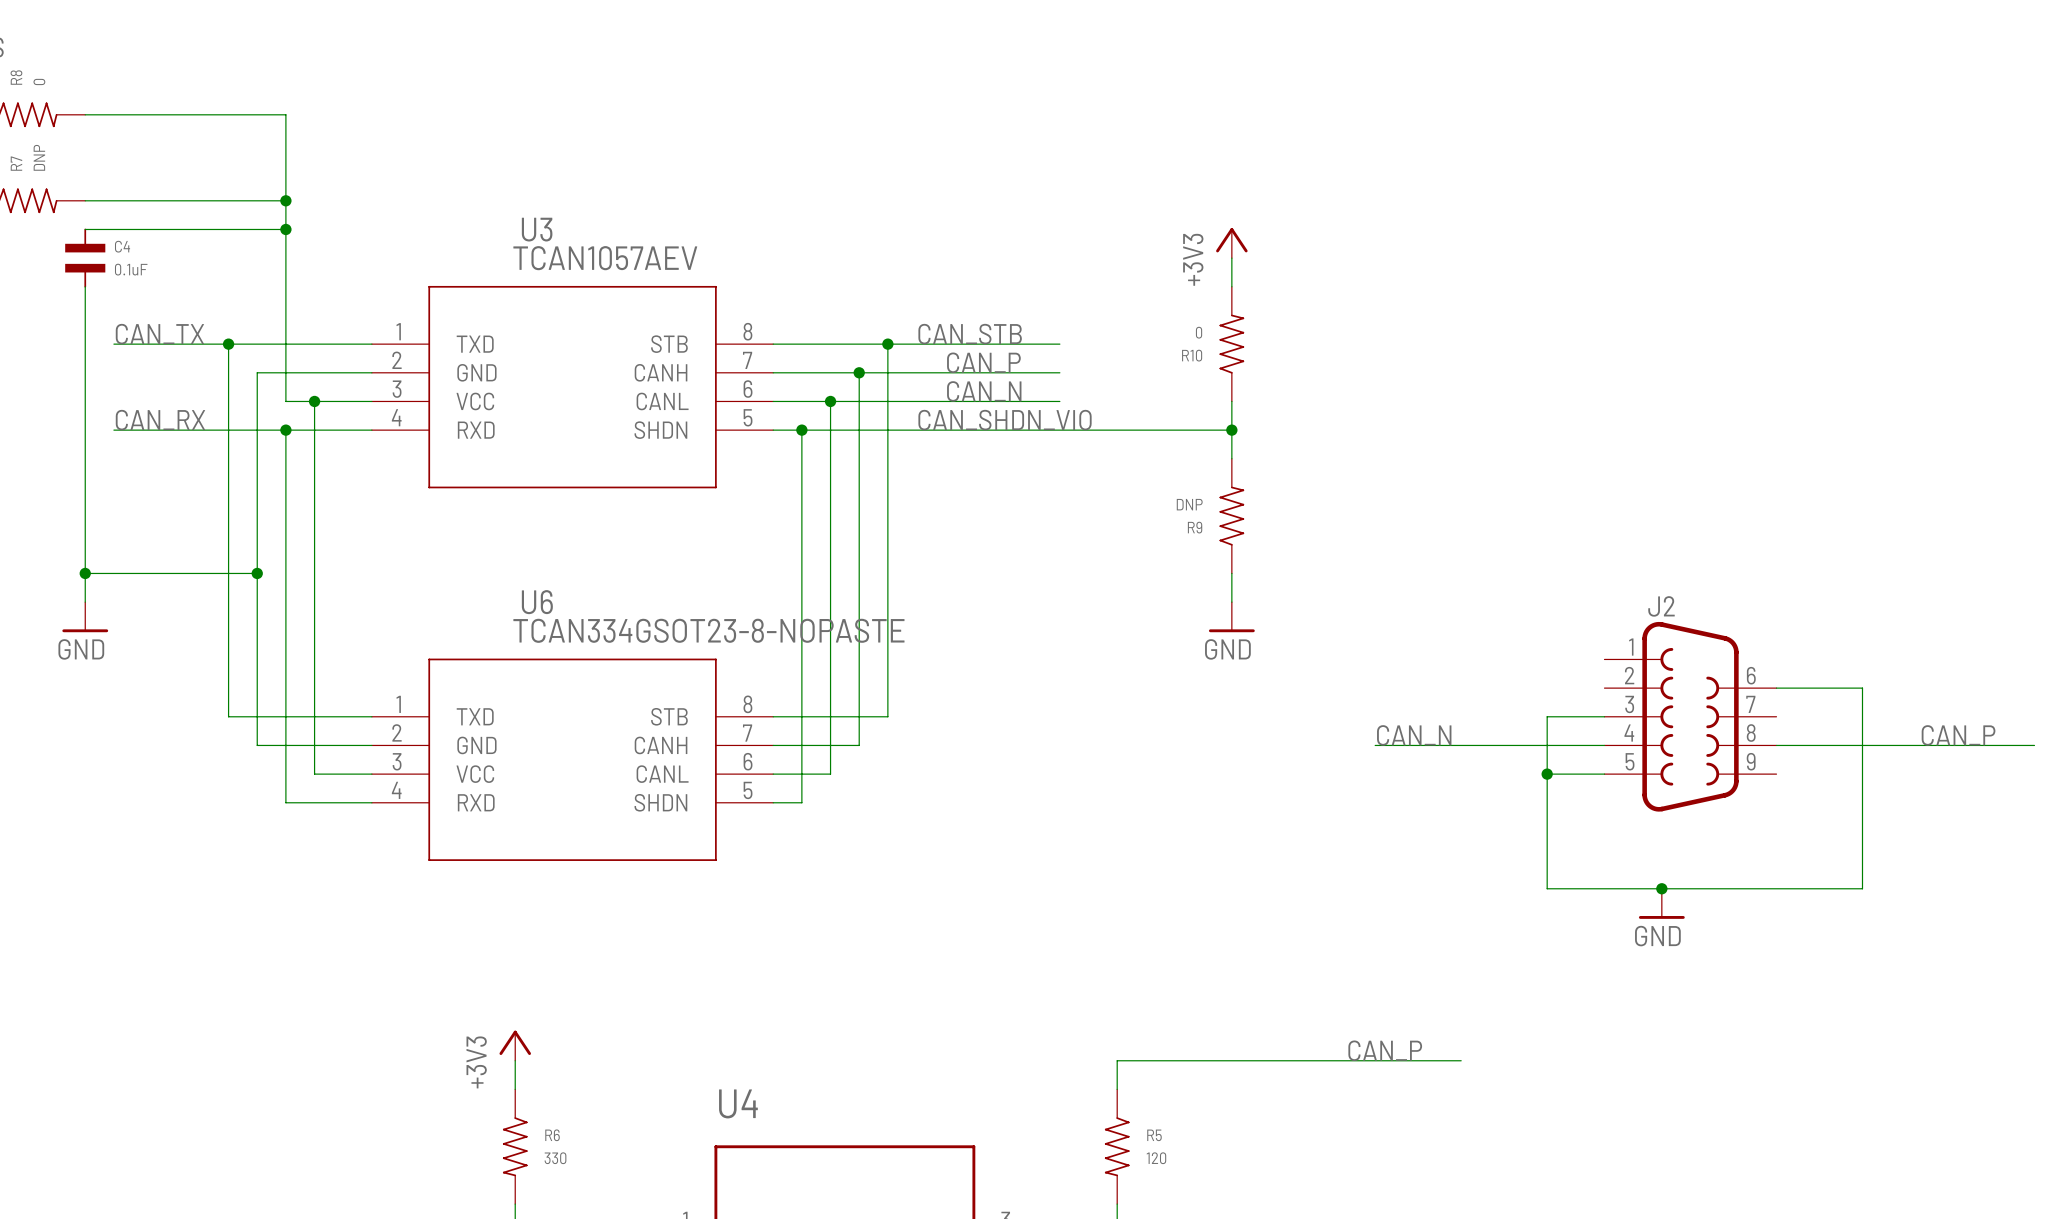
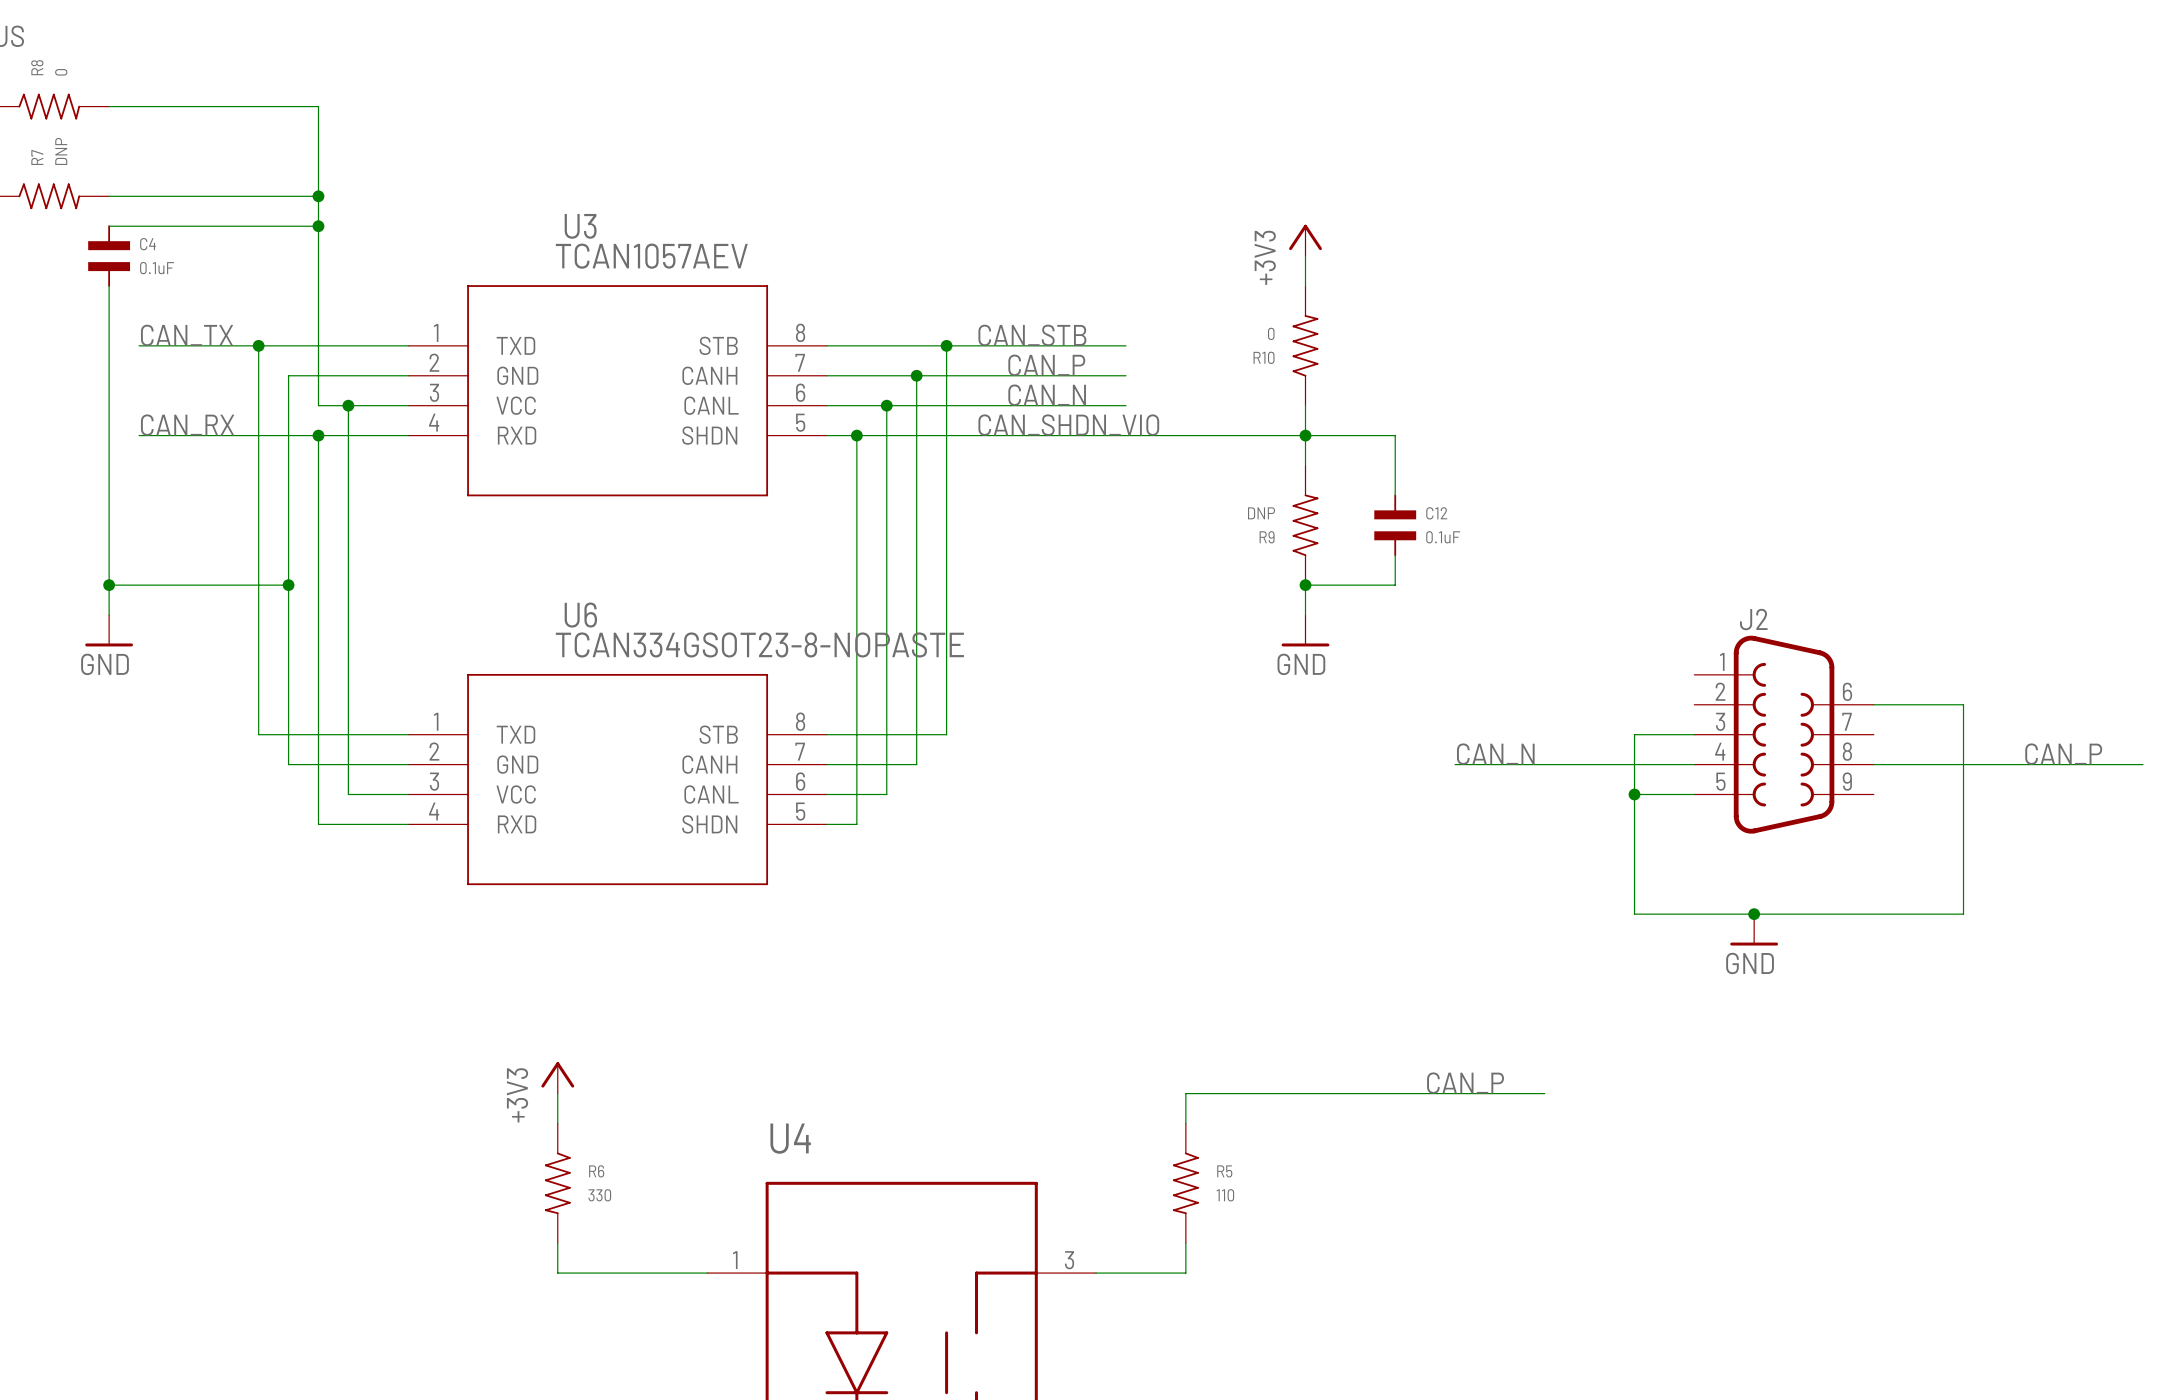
wire: none -> (1305, 435) (1395, 435) (1395, 495)
C12: none -> 0.1uF (1395, 525)
wire: none -> (1395, 555) (1395, 585) (1305, 585)
junction: none -> (1305, 585)
R5 value: 120 (1156, 1158) -> 110 (1225, 1195)

